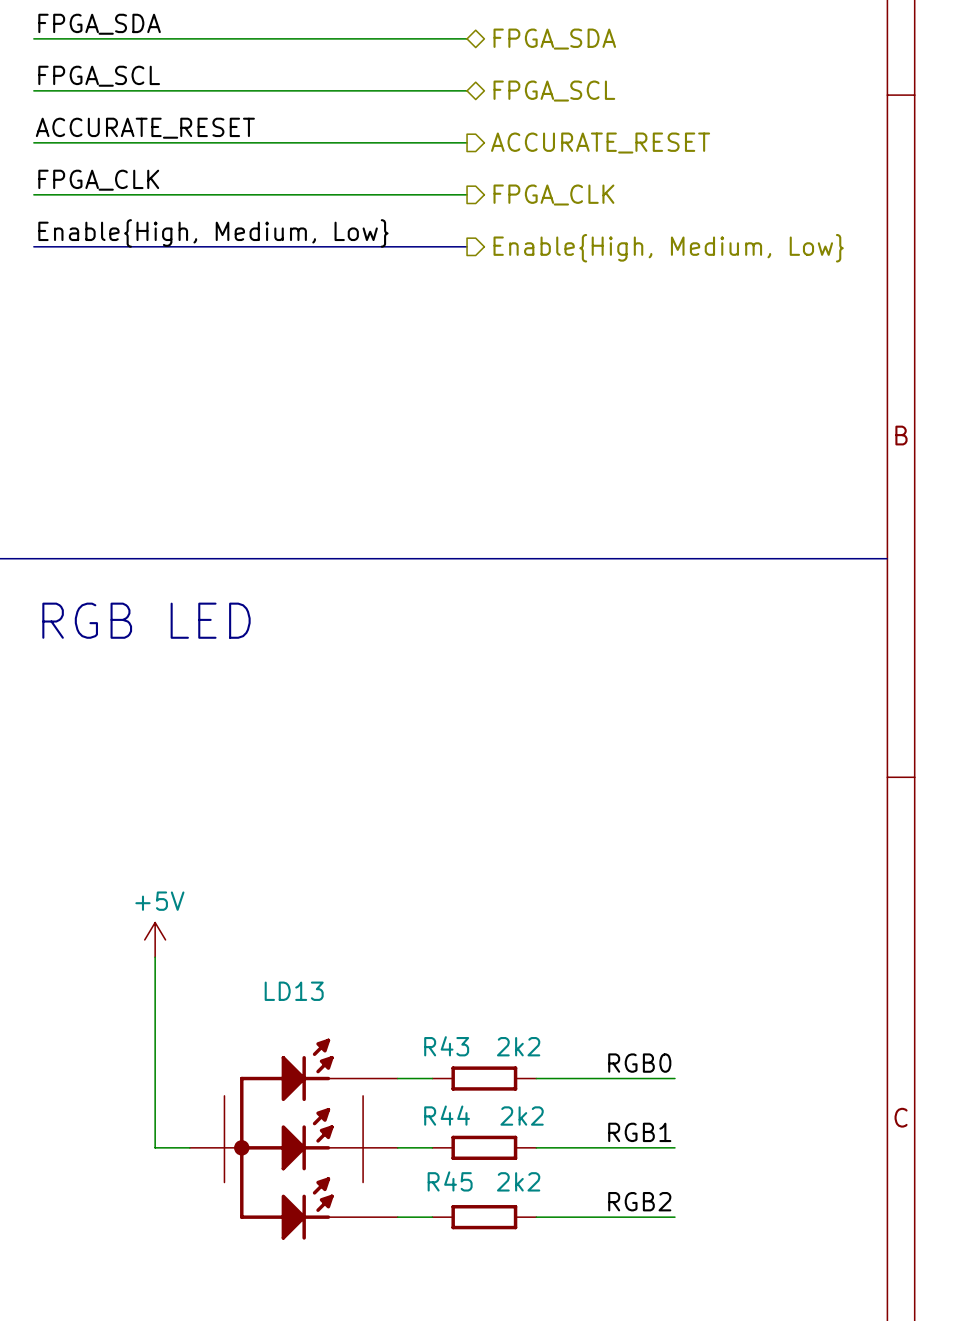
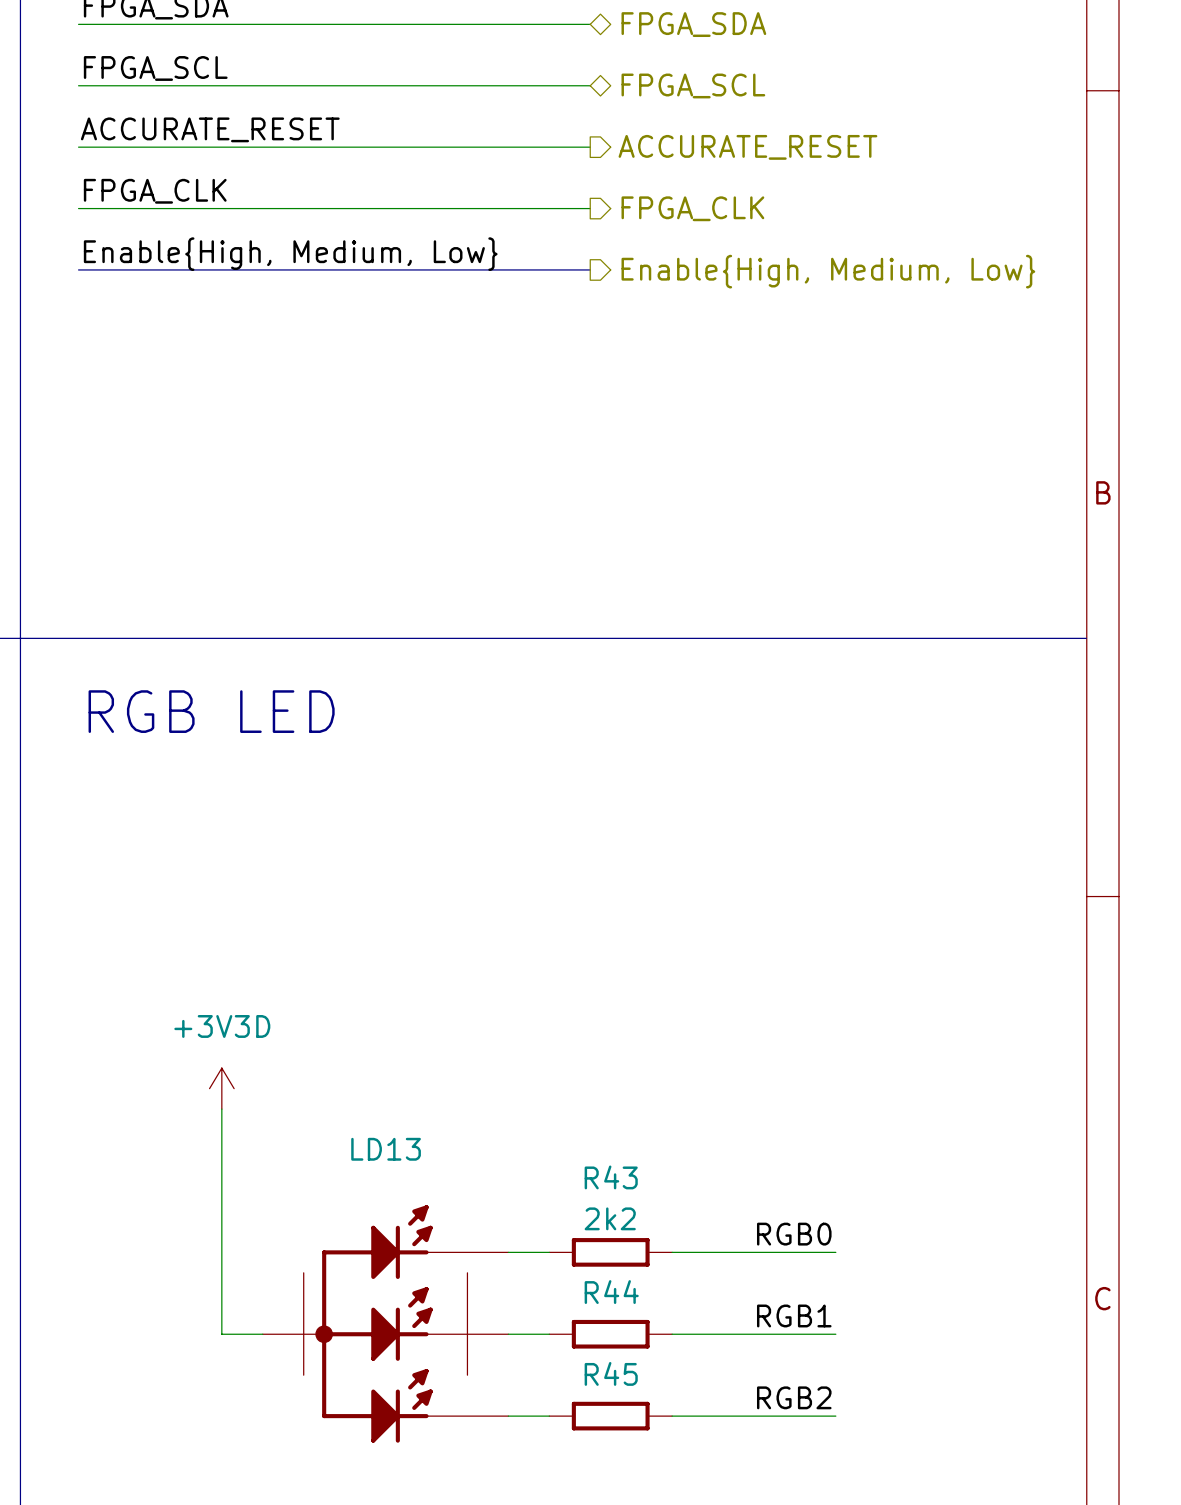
power symbol: +5V (155, 939) -> +3V3D (221, 1088)
R43 name position: R43 (446, 1046) -> R43 (611, 1177)
R43 text position: 2k2 (518, 1046) -> 2k2 (610, 1218)
R44 name position: R44 (447, 1115) -> R44 (611, 1292)
R44 text: 2k2 (522, 1116) -> none
R45 name position: R45 (450, 1181) -> R45 (611, 1373)
R45 text: 2k2 (518, 1181) -> none

